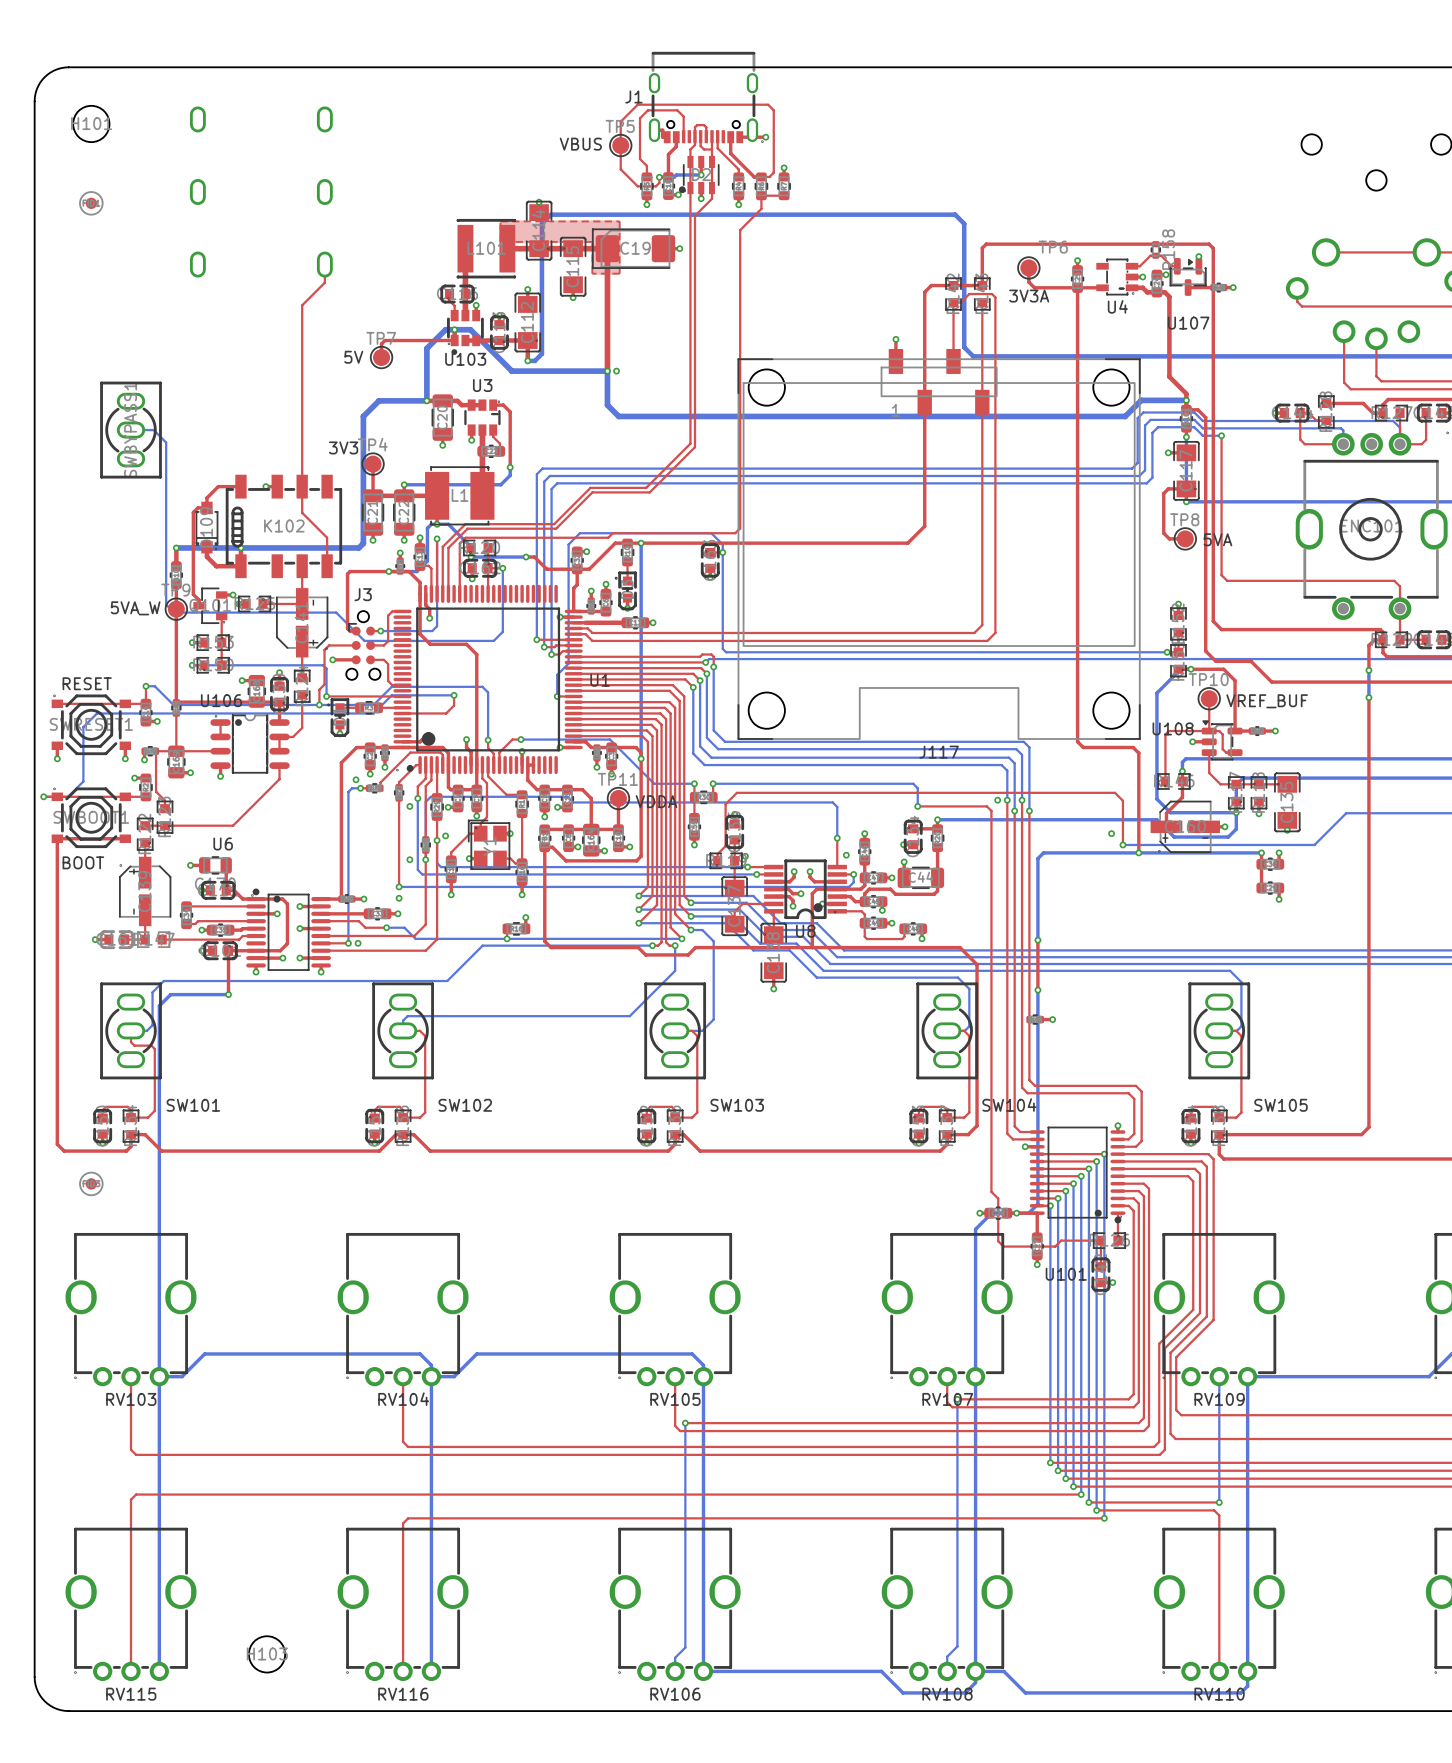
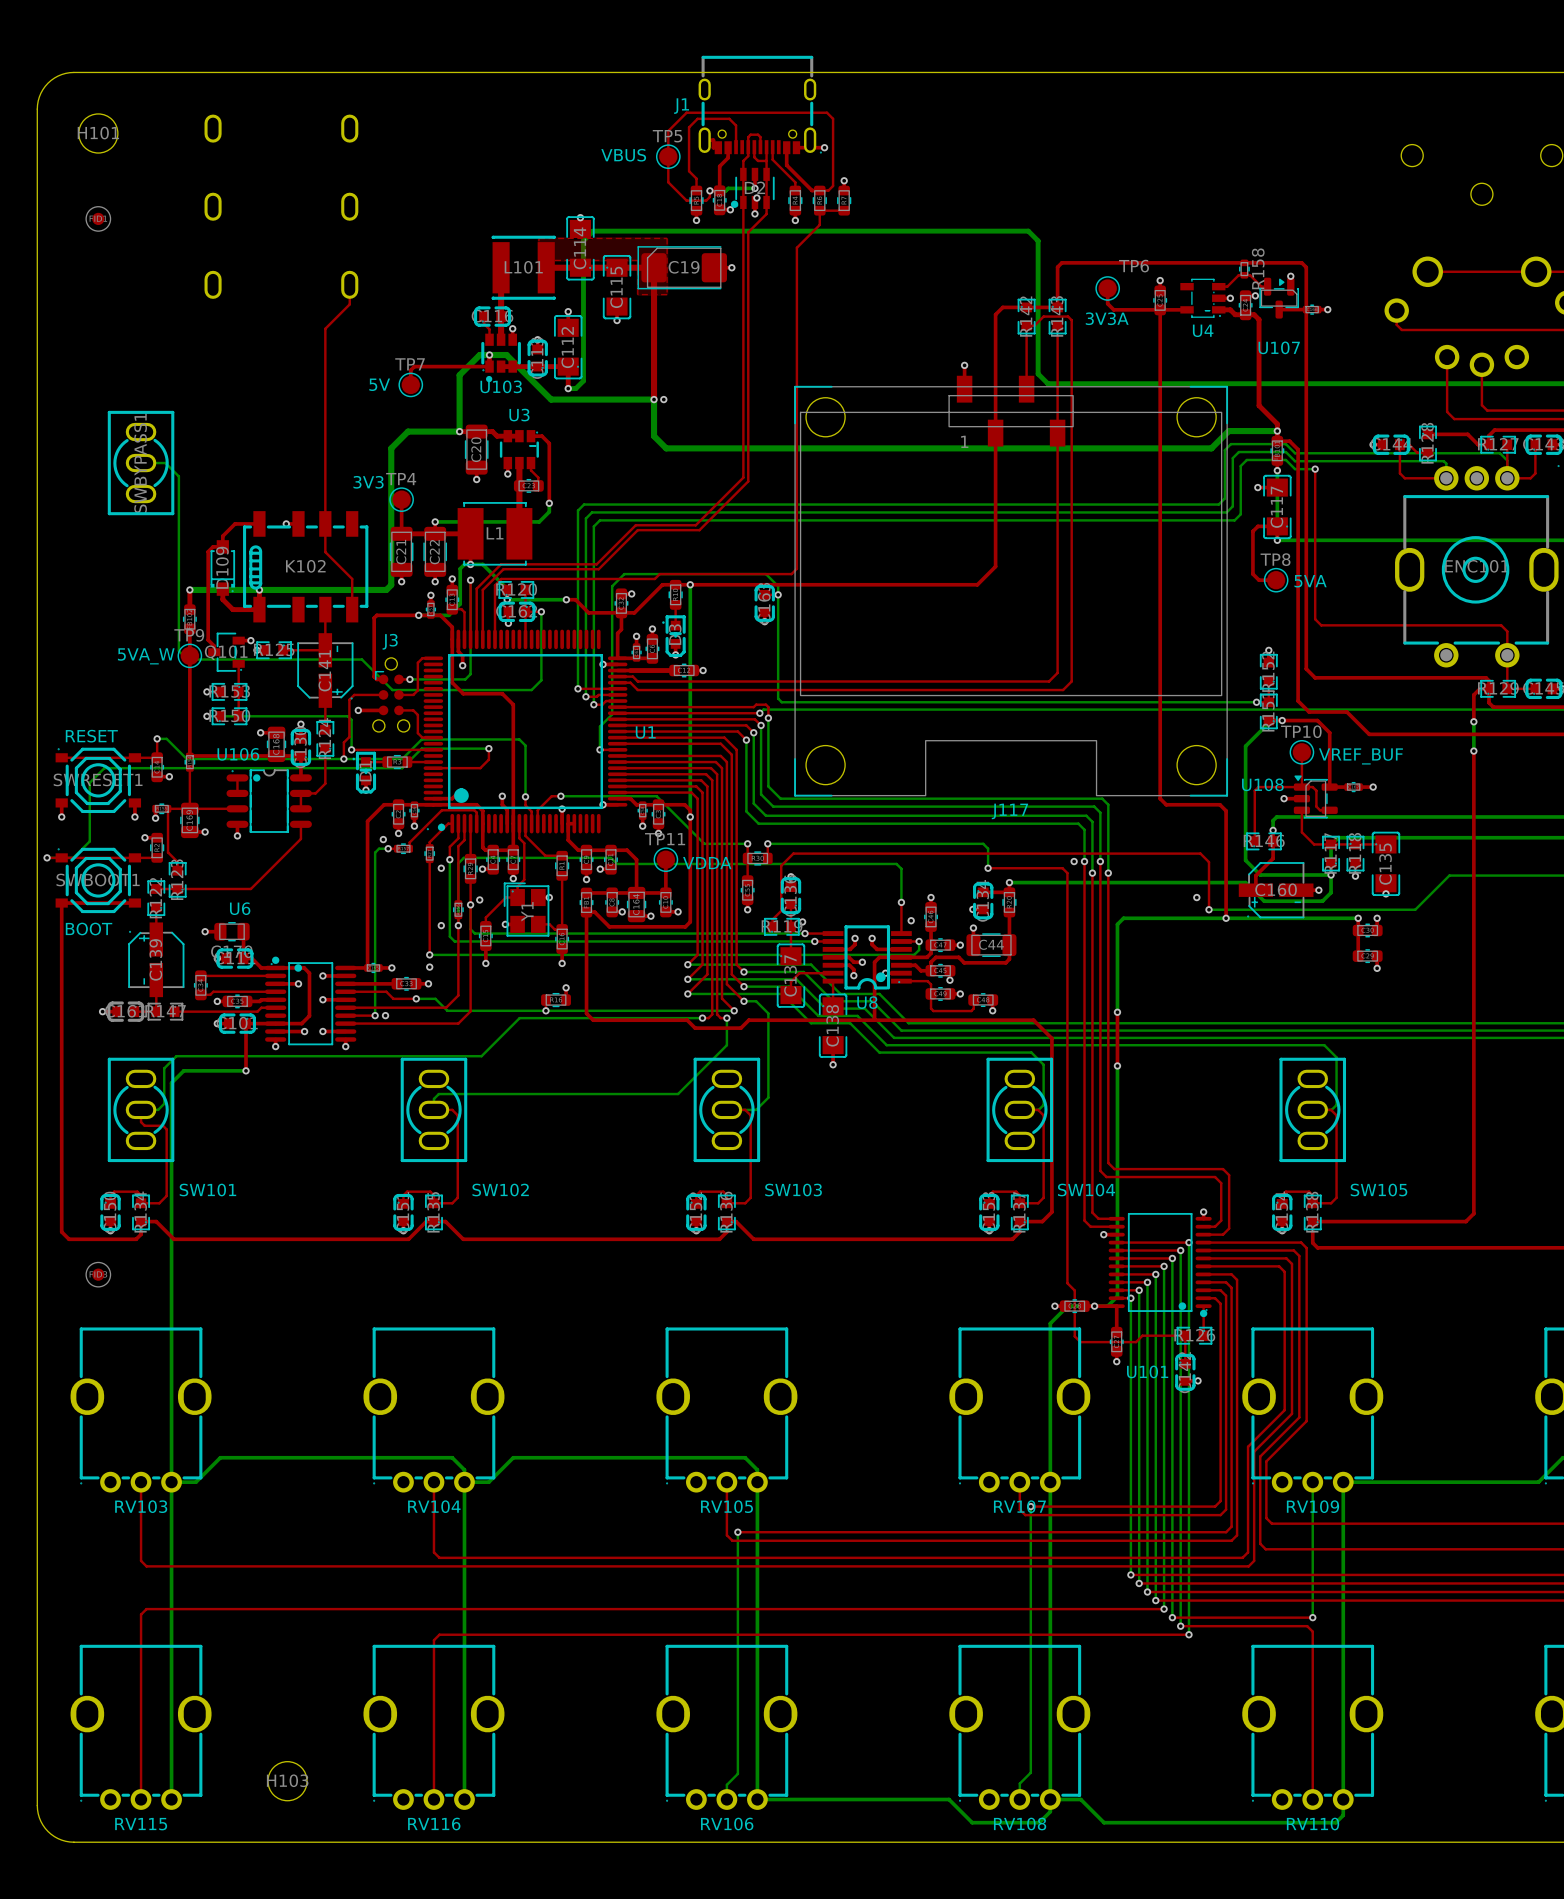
via: none -> (756, 197)
part: (1035, 1019) -> none
top track: (1040, 1019) (1052, 1019) -> none
via: (1052, 1019) -> none

